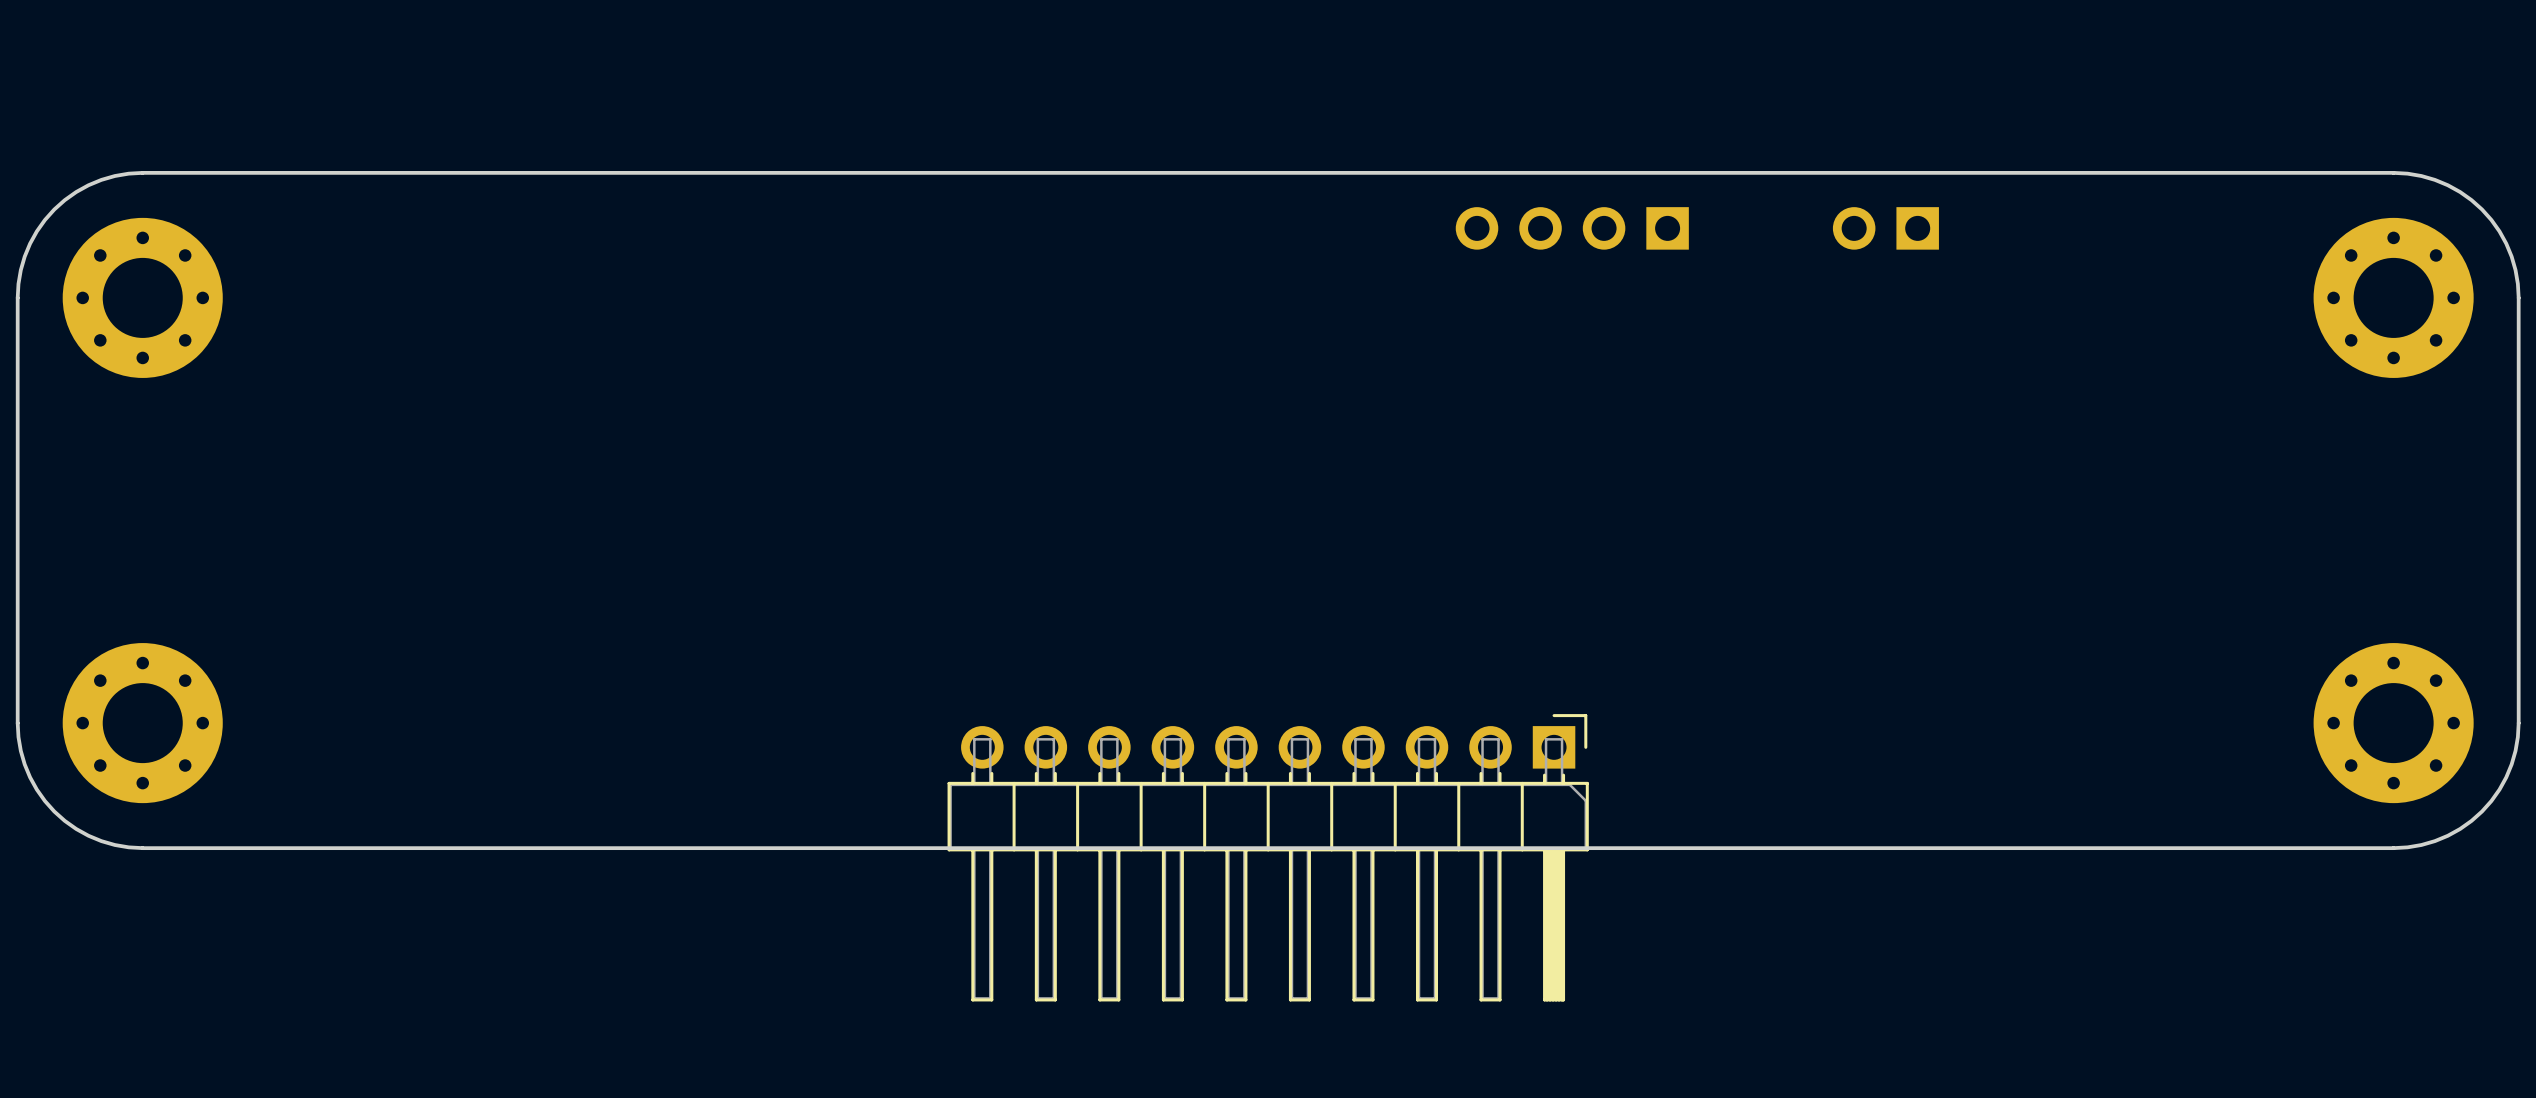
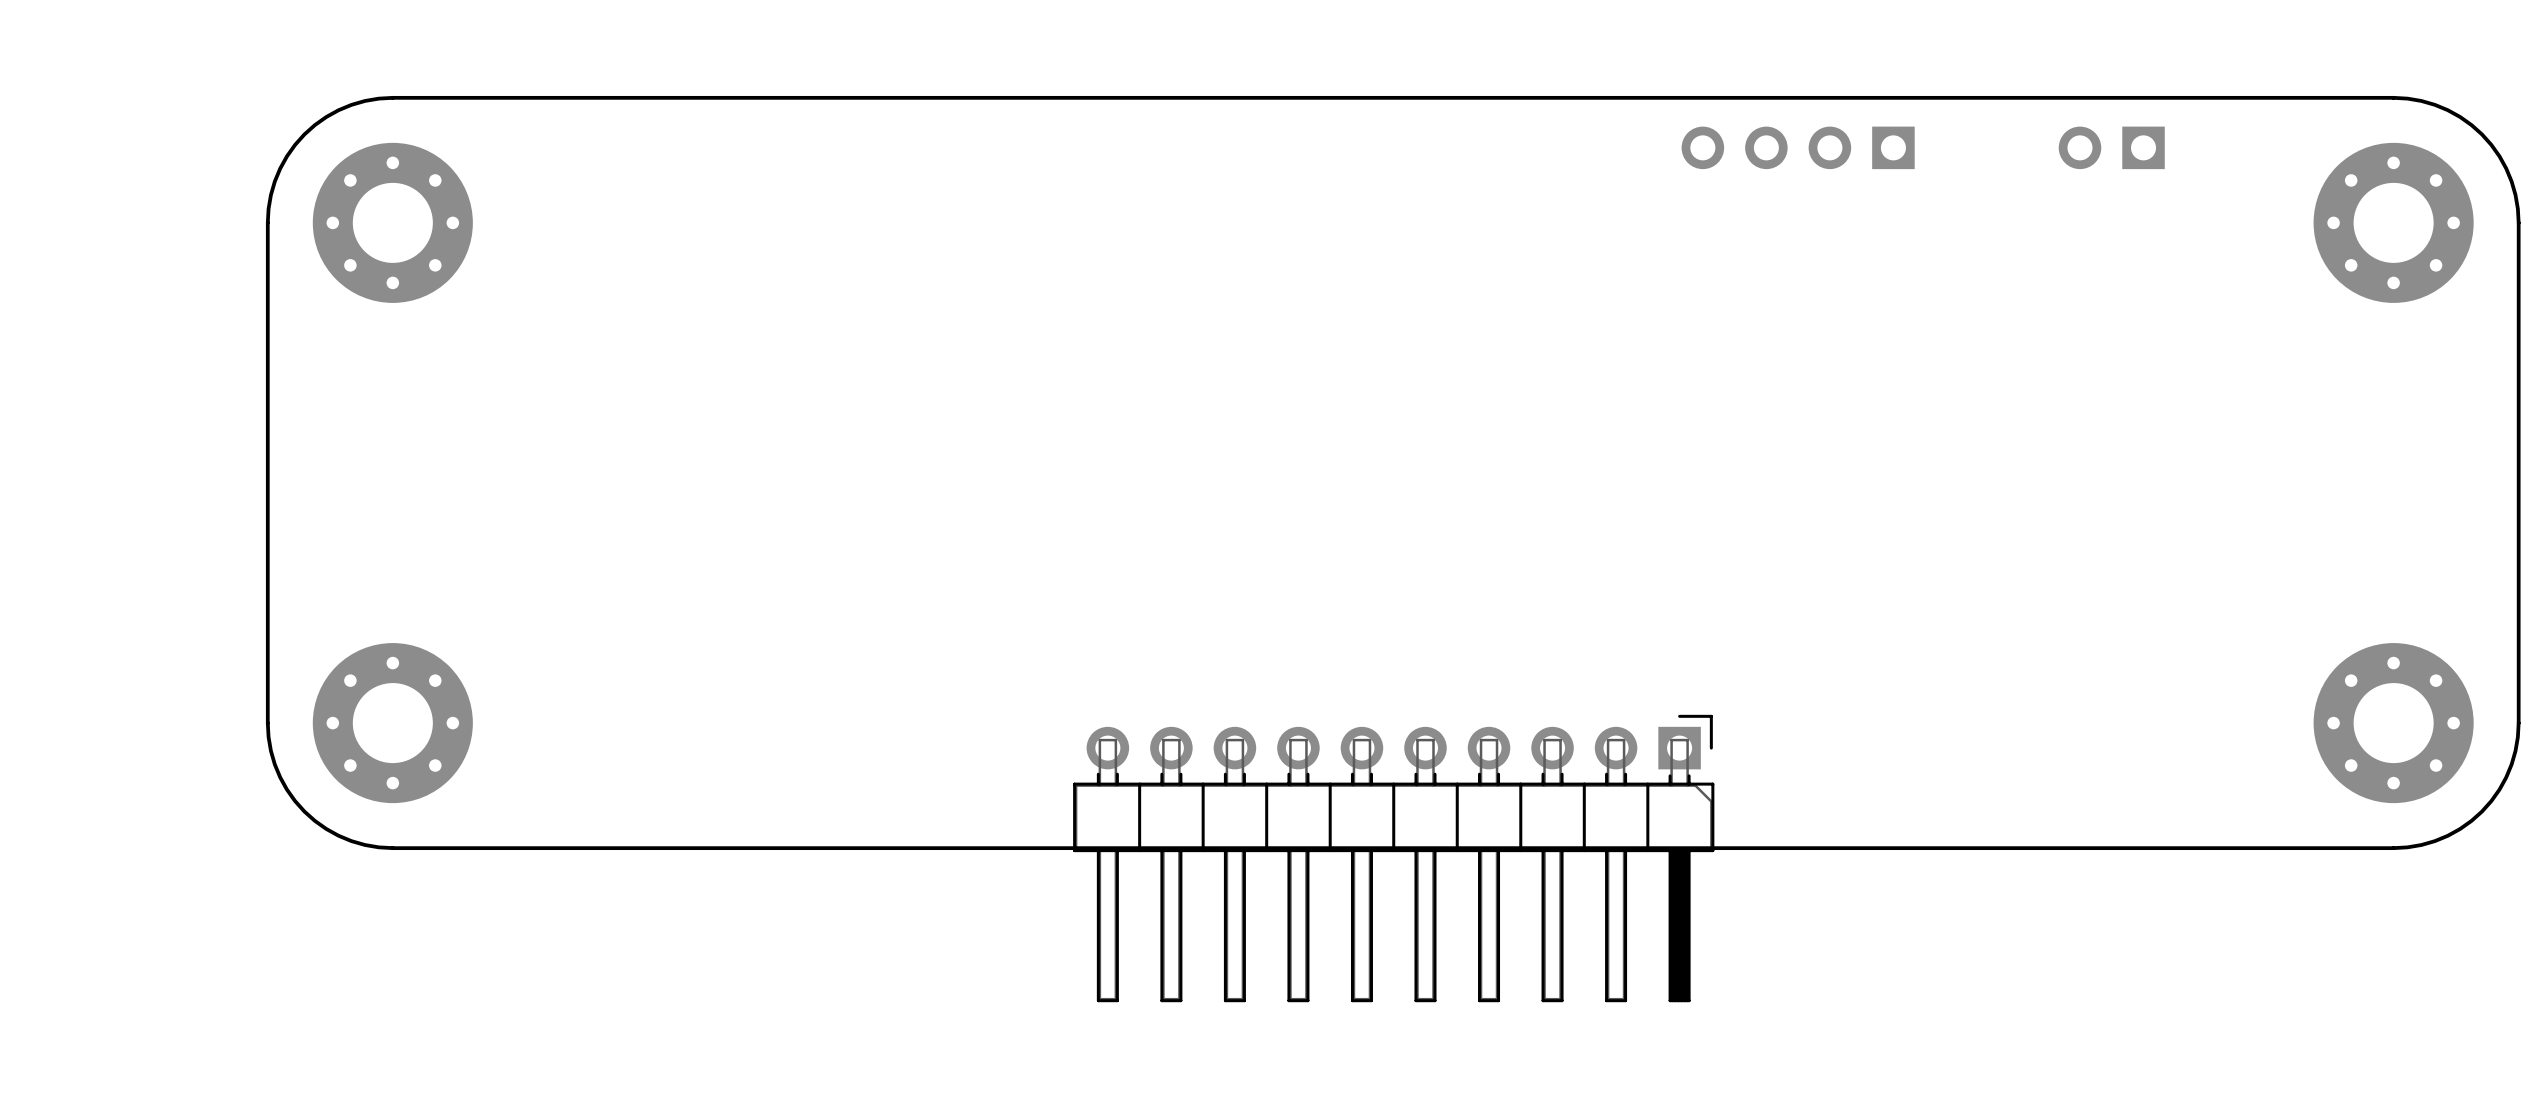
part: none -> (392, 222)
part position: (1572, 228) -> (1798, 147)
part position: (1885, 228) -> (2111, 147)
part: (142, 297) -> none
part position: (2393, 297) -> (2393, 222)
board edge: (2518, 297) (2515, 270) (2506, 243) (2491, 219) (2482, 209) (2460, 192) (2434, 179) (2407, 173) (2393, 172) (142, 172) (114, 176) (88, 185) (64, 200) (44, 219) (36, 231) (24, 256) (18, 283) (17, 723) (20, 750) (30, 777) (44, 801) (64, 820) (88, 835) (114, 845) (142, 848) (392, 848) -> (2518, 297) (2517, 208) (2511, 181) (2499, 156) (2482, 134) (2460, 117) (2434, 104) (2407, 98) (392, 97) (365, 100) (351, 104) (326, 117) (304, 134) (286, 156) (280, 168) (274, 181) (268, 208) (267, 723) (268, 737) (274, 764) (286, 789) (304, 811) (326, 828) (351, 841) (378, 847) (392, 848)
part: (142, 723) -> none
part: none -> (392, 723)
part position: (1268, 857) -> (1393, 858)

